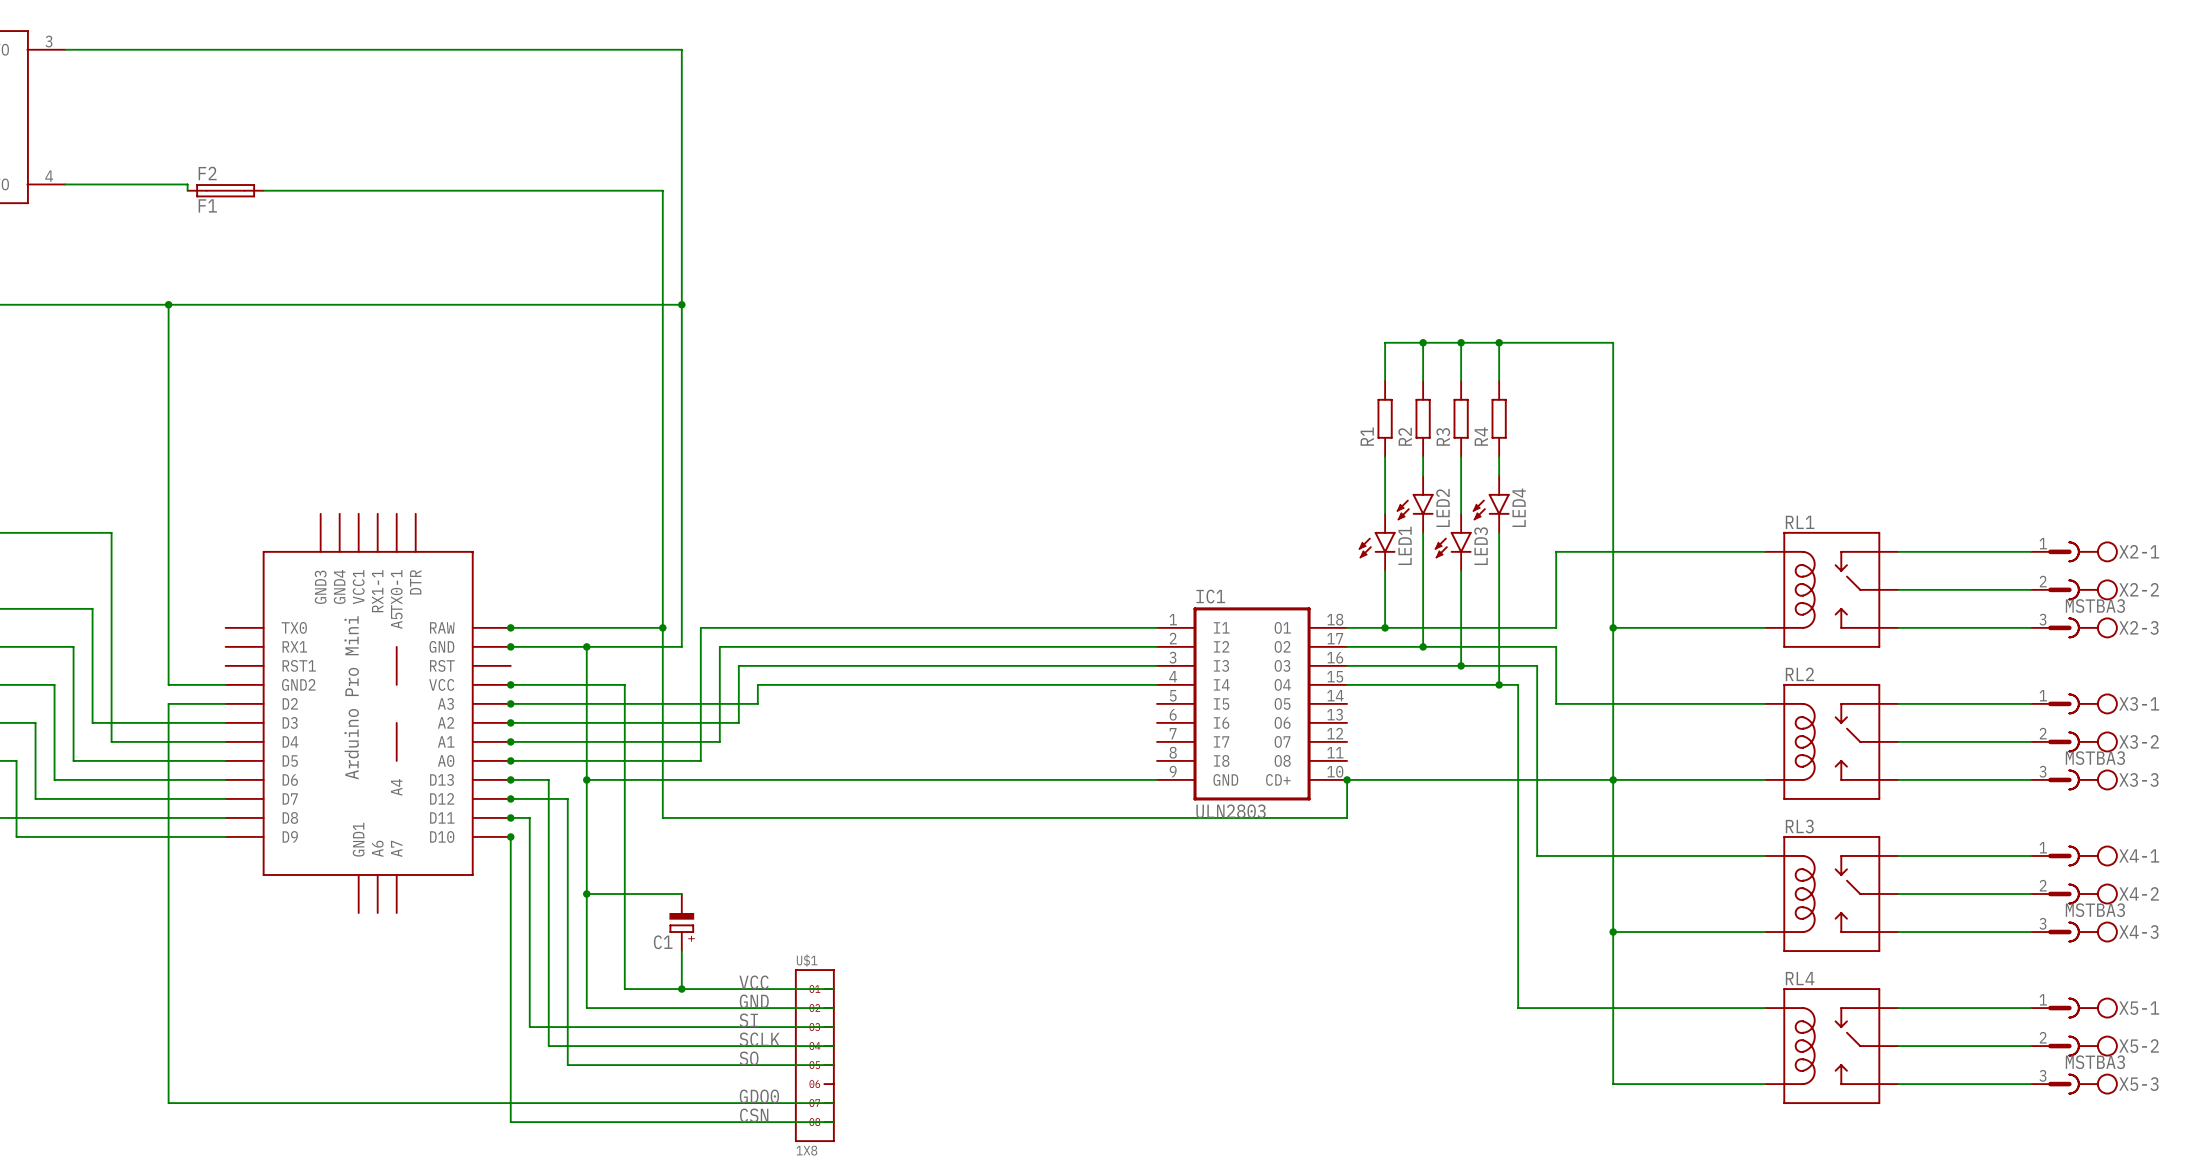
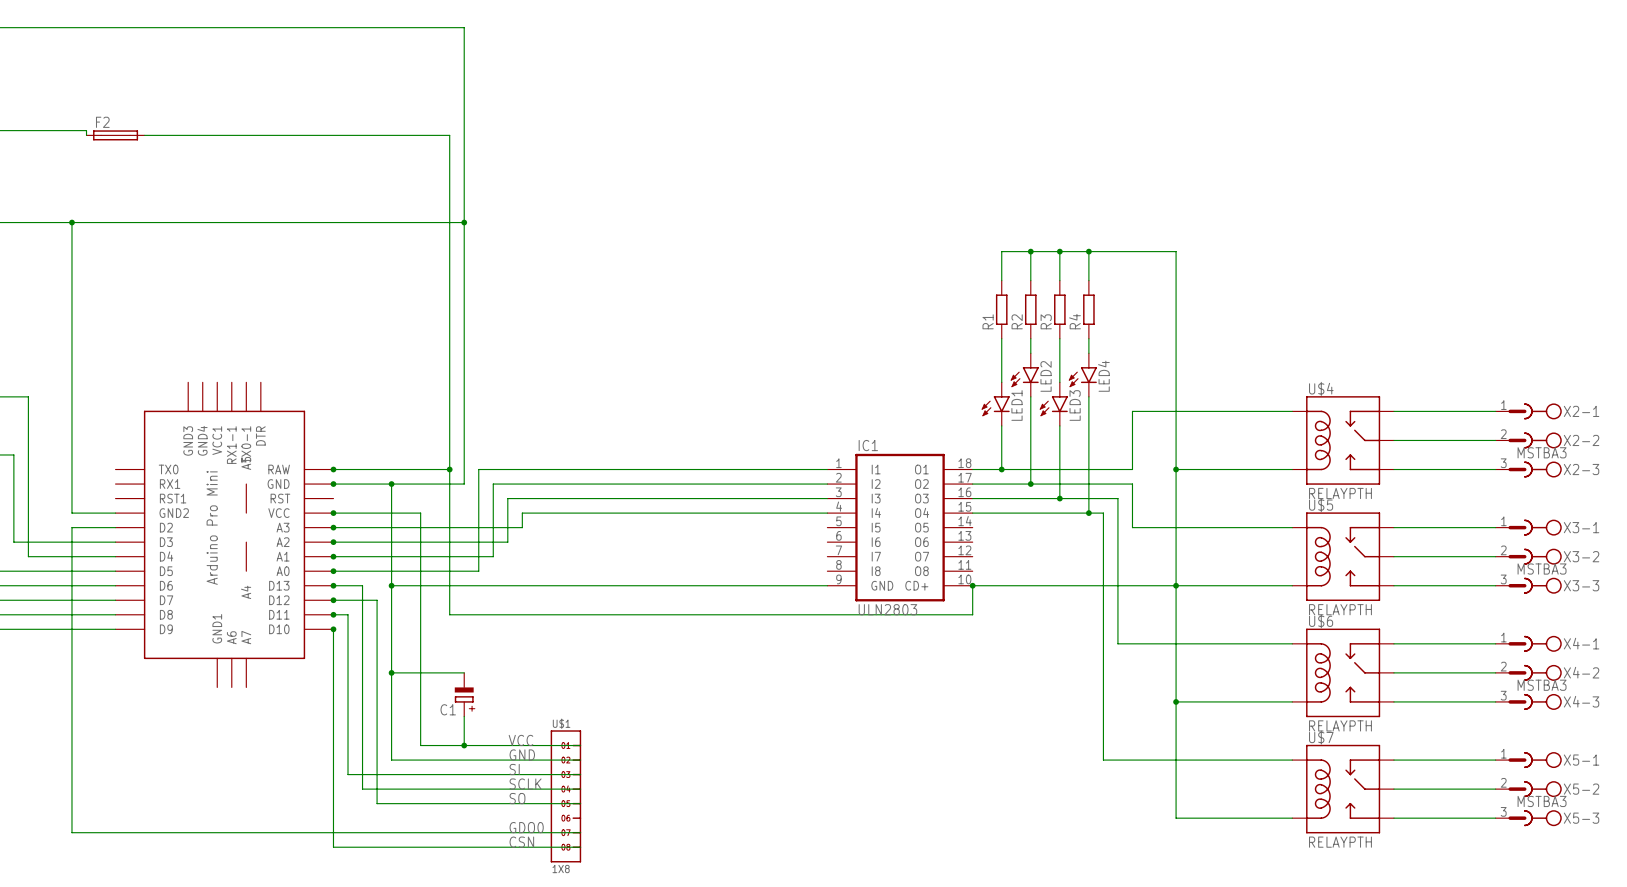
F2 value: F1 (207, 205) -> none
RL1 name: RL1 (1800, 522) -> U$4 (1321, 388)
RL1 value: none -> RELAYPTH (1340, 493)
RL2 name: RL2 (1799, 674) -> U$5 (1321, 505)
RL2 value: none -> RELAYPTH (1340, 609)
RL3 name: RL3 (1799, 826) -> U$6 (1321, 621)
RL3 value: none -> RELAYPTH (1340, 725)
RL4 name: RL4 (1800, 978) -> U$7 (1321, 737)
RL4 value: none -> RELAYPTH (1340, 842)

